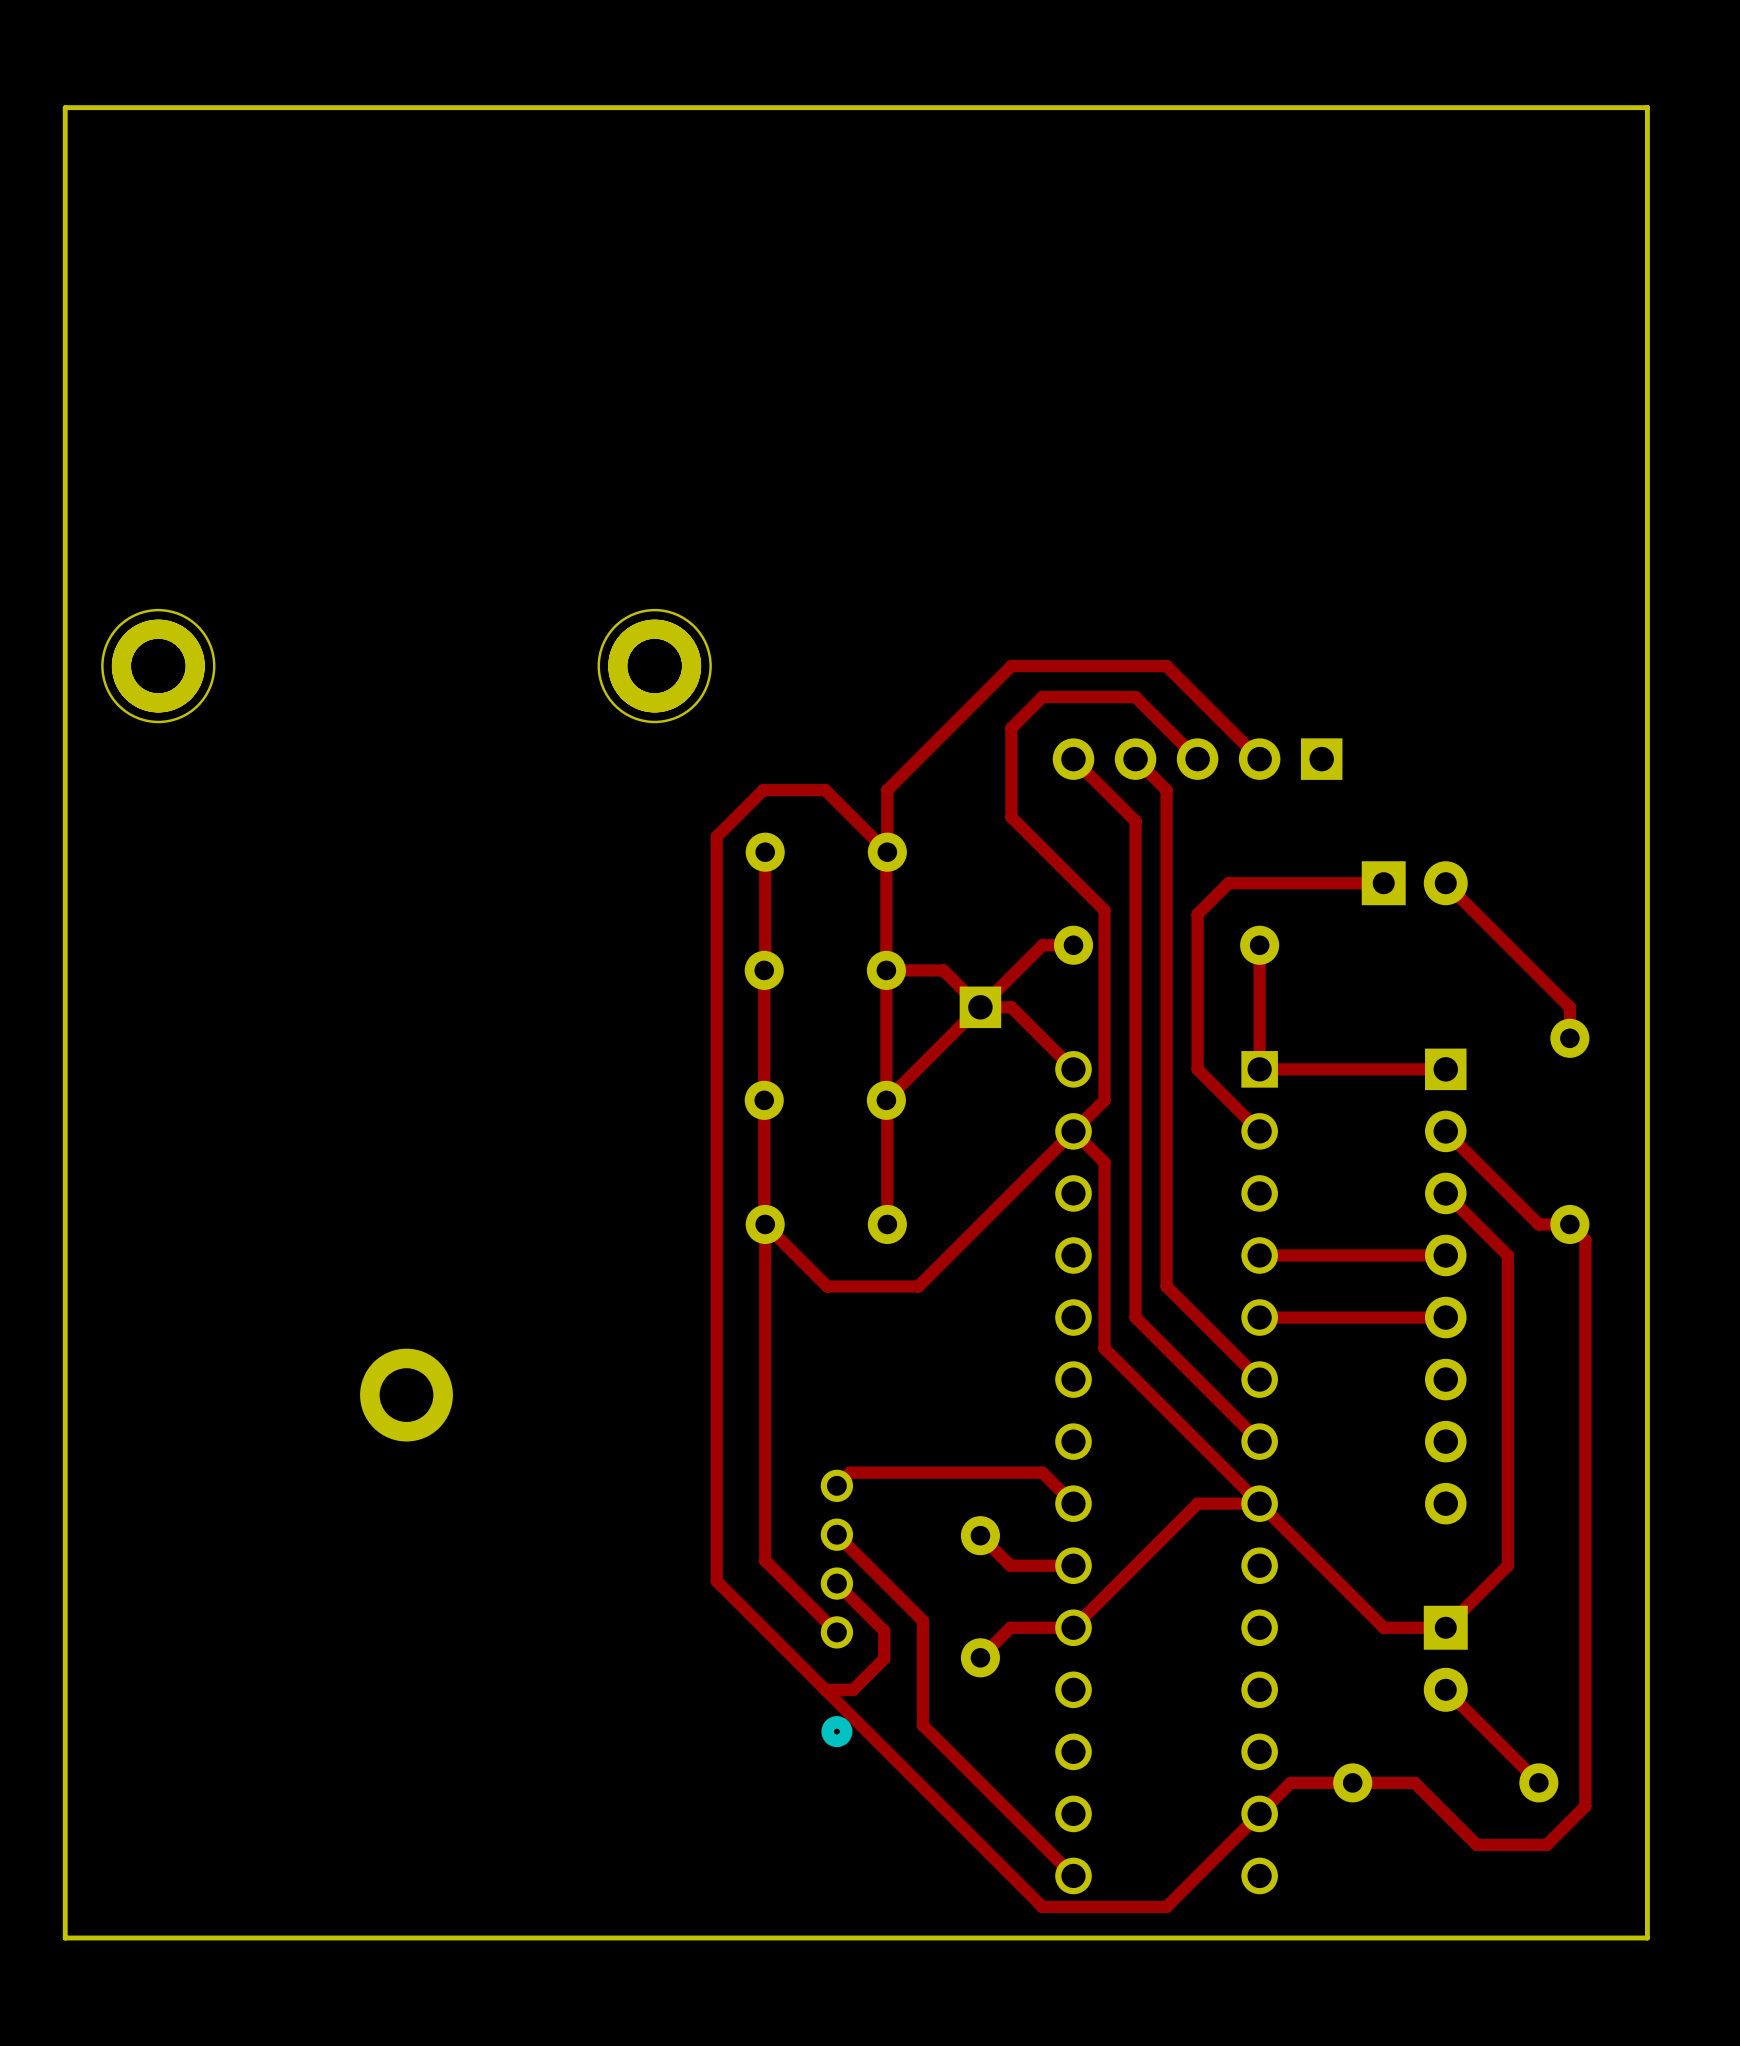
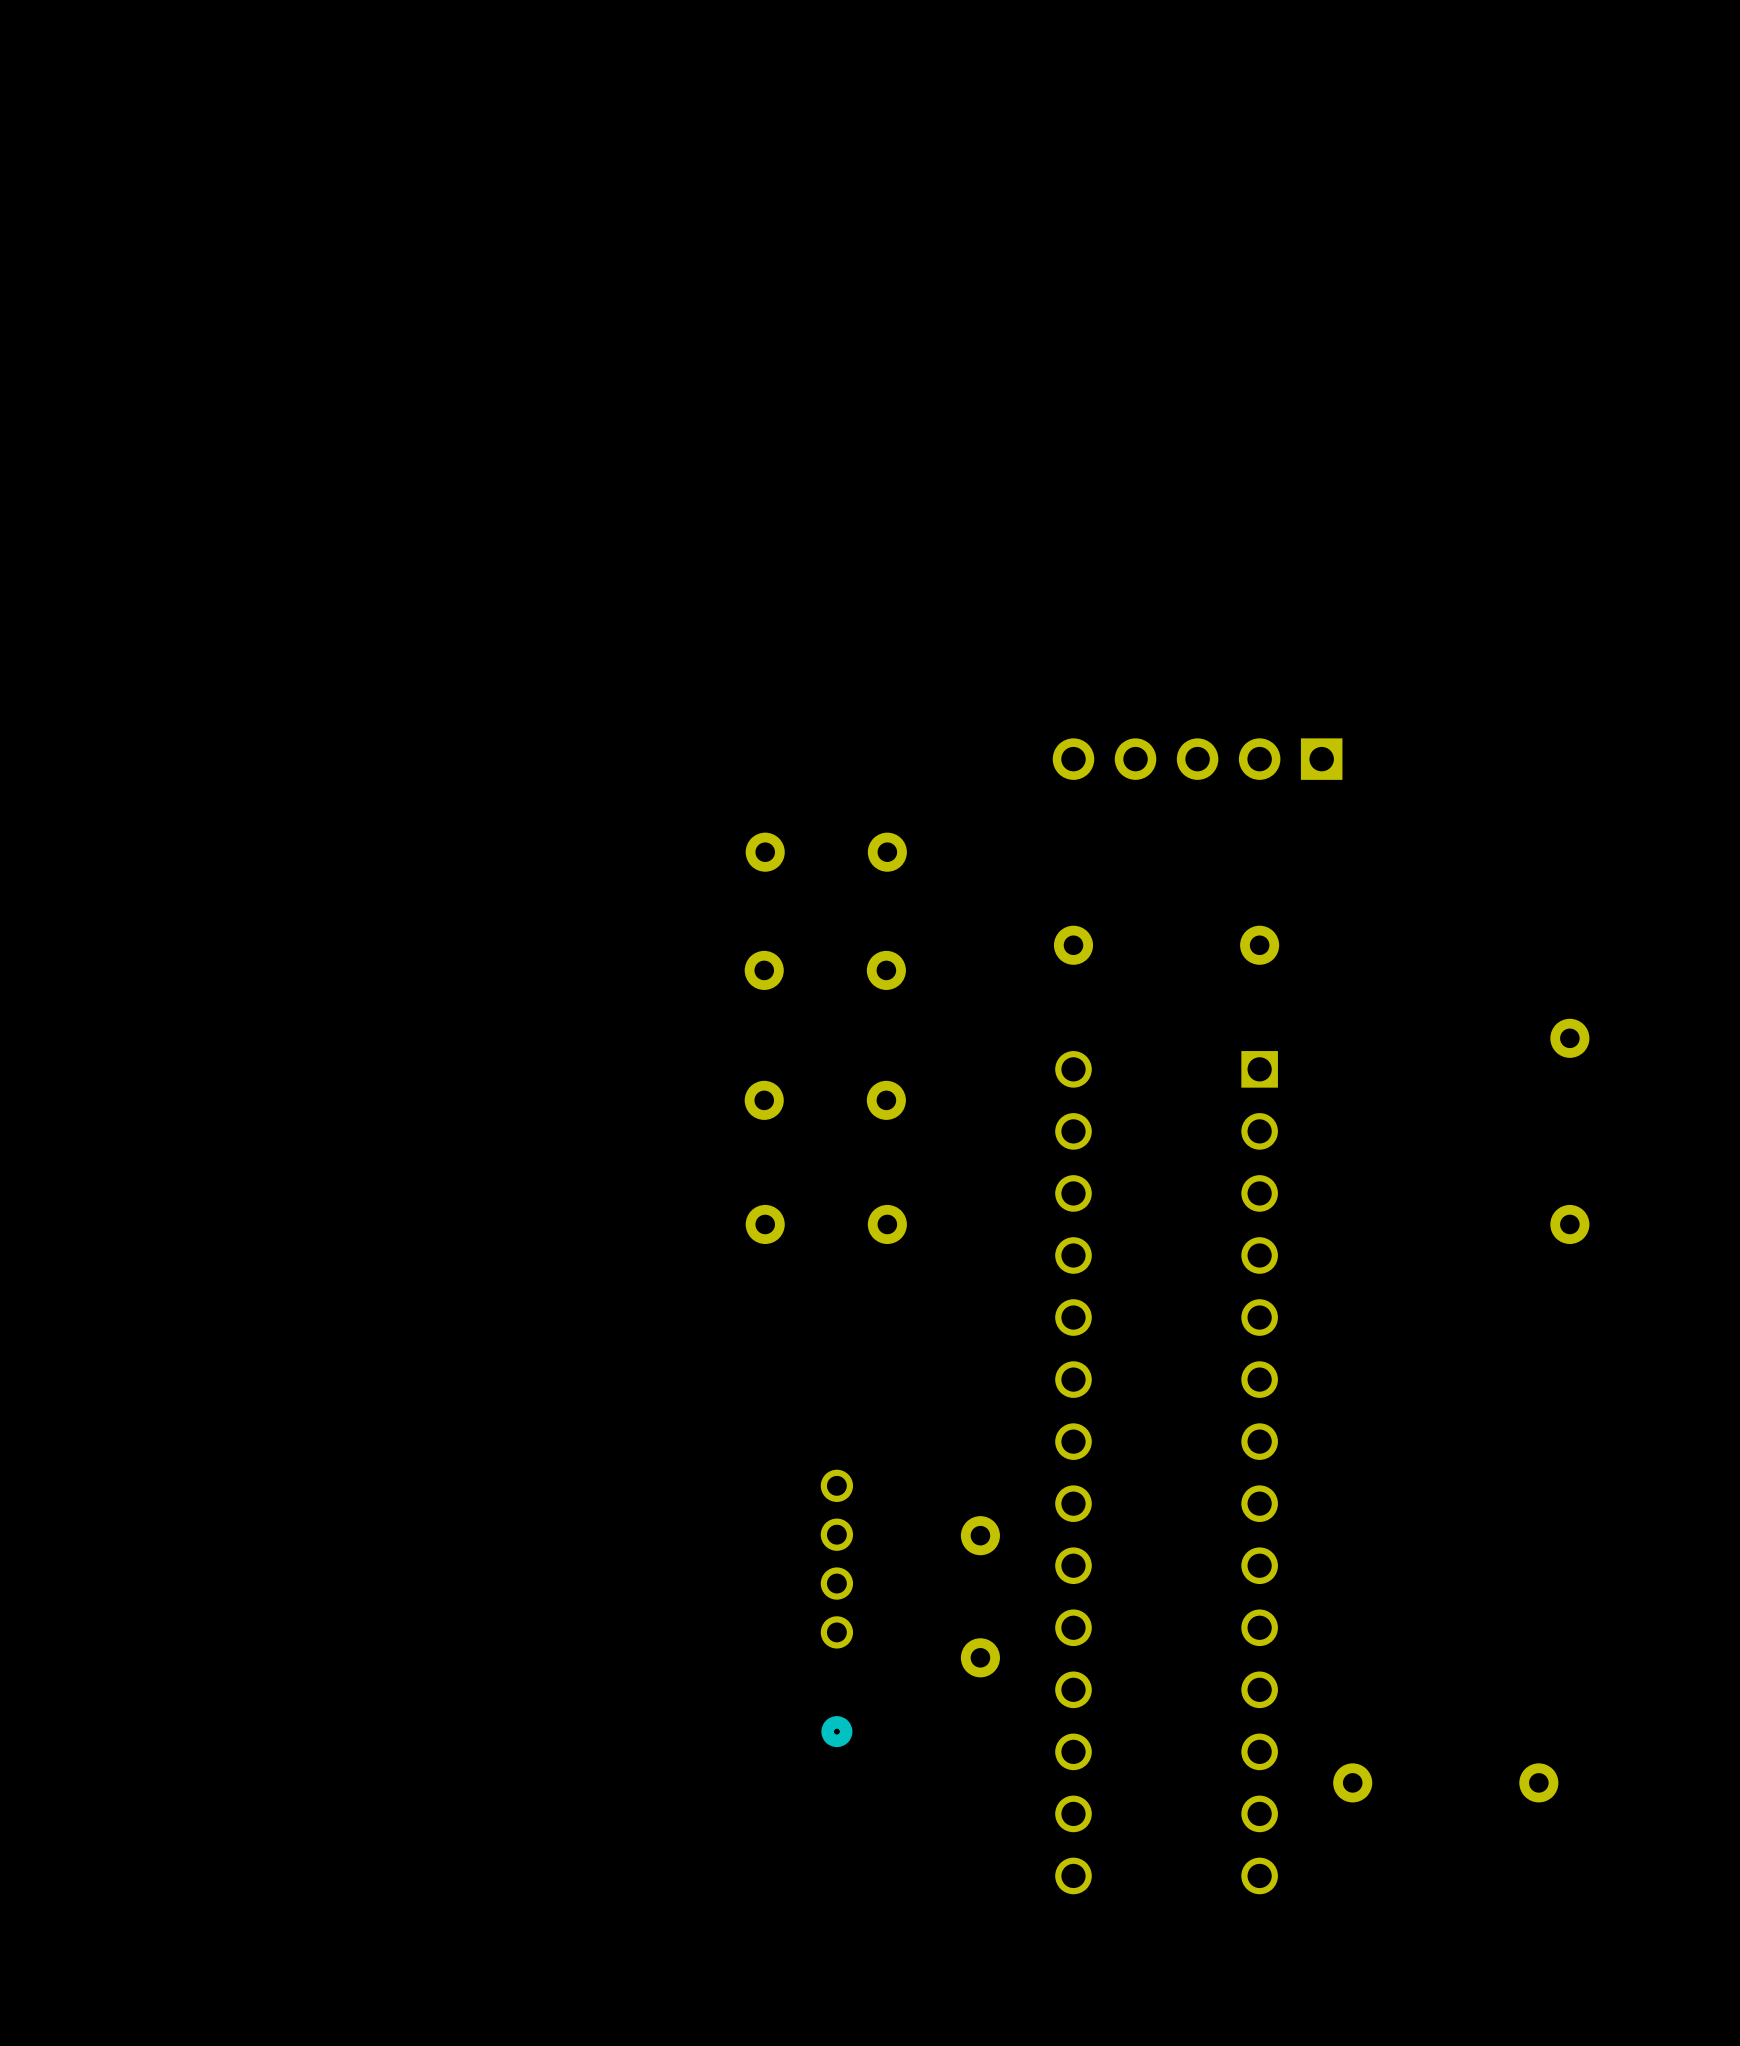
board edge: (1647, 107) (65, 107) (65, 1938) (1647, 1938) (1647, 107) -> none
round board edge: [101, 608, 216, 724] -> none
round board edge: [597, 608, 712, 724] -> none
part: (158, 666) -> none
part: (654, 666) -> none
top track: (1073, 759) (1135, 821) (1135, 1317) (1259, 1441) -> none
top track: (1135, 759) (1166, 790) (1166, 1286) (1259, 1379) -> none
top track: (1197, 759) (1135, 697) (1042, 697) (1011, 728) (1011, 817) (1104, 910) (1104, 1100) (918, 1286) (827, 1286) (764, 1223) (765, 852) -> none
top track: (1259, 759) (1166, 666) (1011, 666) (887, 790) (887, 852) -> none
top track: (887, 852) (825, 790) (763, 790) (716, 836) (716, 1581) (1042, 1906) (1166, 1906) (1290, 1782) (1414, 1782) (1476, 1844) (1546, 1844) (1585, 1806) (1585, 1239) (1569, 1224) (1538, 1224) (1445, 1131) -> none
top track: (887, 852) (886, 1100) -> none
top track: (1383, 883) (1228, 883) (1197, 914) (1197, 1069) (1259, 1131) -> none
part: (1414, 883) -> none
top track: (1445, 883) (1569, 1007) (1569, 1038) -> none
top track: (1073, 945) (1042, 945) (980, 1007) (943, 970) (886, 970) -> none
top track: (1259, 945) (1259, 1069) (1445, 1069) -> none
part: (980, 1007) -> none
top track: (1073, 1069) (1011, 1007) (979, 1007) (886, 1100) -> none
top track: (886, 1100) (887, 1224) -> none
top track: (1073, 1131) (1104, 1162) (1104, 1348) (1383, 1627) (1445, 1627) (1507, 1565) (1507, 1255) (1445, 1193) -> none
top track: (765, 1224) (765, 1560) (836, 1632) -> none
top track: (1445, 1255) (1259, 1255) -> none
part: (1445, 1286) -> none
top track: (1445, 1317) (1259, 1317) -> none
part: (406, 1395) -> none
top track: (836, 1485) (850, 1472) (1042, 1472) (1073, 1503) -> none
top track: (1259, 1503) (1197, 1503) (1073, 1627) (1010, 1627) (980, 1657) -> none
top track: (836, 1534) (922, 1620) (922, 1725) (1073, 1875) -> none
top track: (980, 1535) (1010, 1565) (1073, 1565) -> none
top track: (836, 1583) (884, 1630) (884, 1658) (853, 1689) (825, 1689) -> none
part: (1445, 1658) -> none
top track: (1445, 1689) (1538, 1782) -> none

